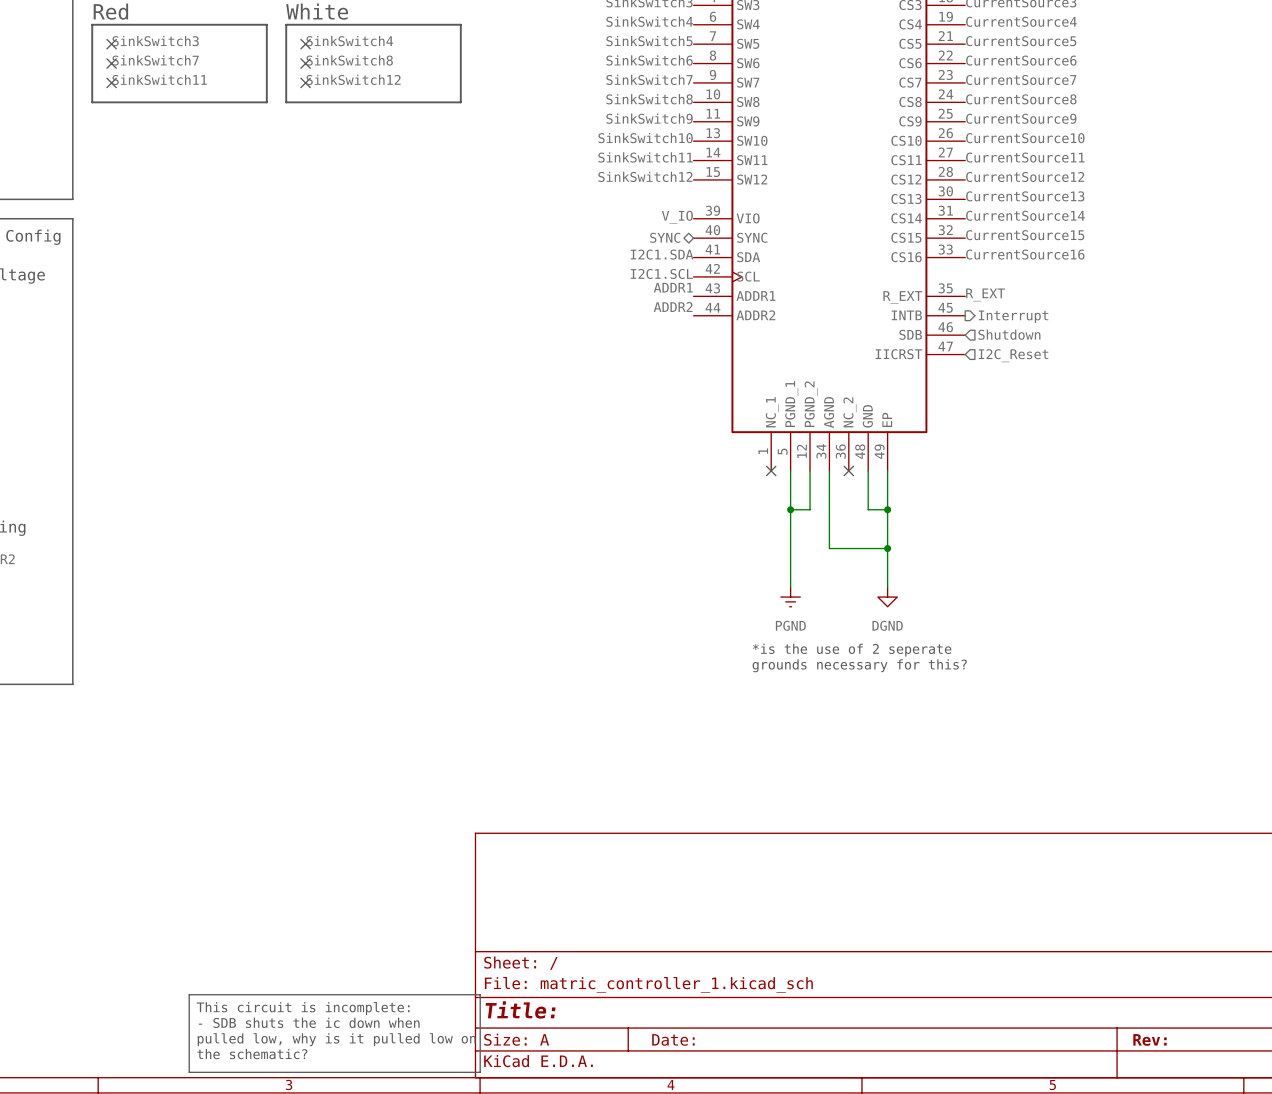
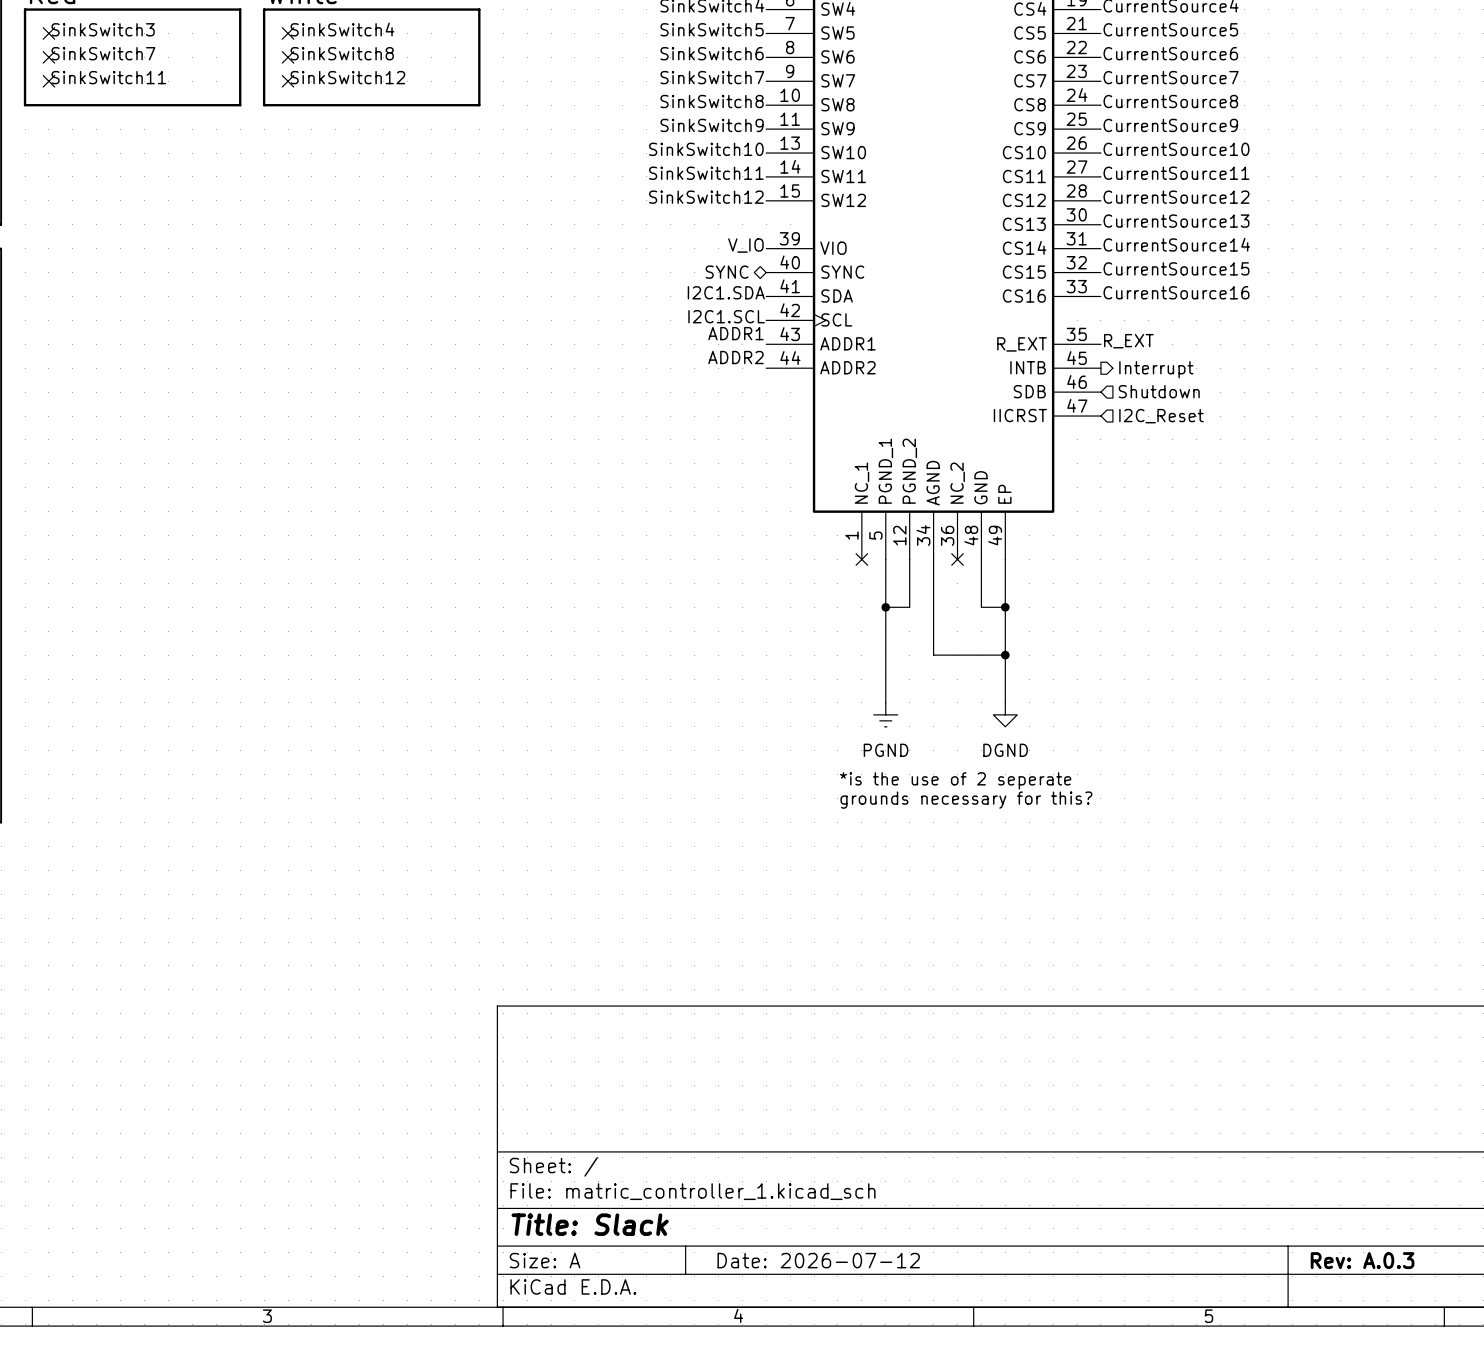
line: (189, 994) (480, 994) (480, 1072) (189, 1072) (189, 994) -> none
text: This circuit is incomplete: (303, 1008) -> none
title block: Title: (520, 1009) -> Title: Slack (590, 1224)
text: - SDB shuts the ic down when (309, 1022) -> none
text: pulled low, why is it pulled low on (336, 1039) -> none
title block: Date: (673, 1039) -> Date: 2026-07-12 (818, 1260)
title block: Rev: (1150, 1039) -> Rev: A.0.3 (1362, 1260)
text: the schematic? (252, 1054) -> none

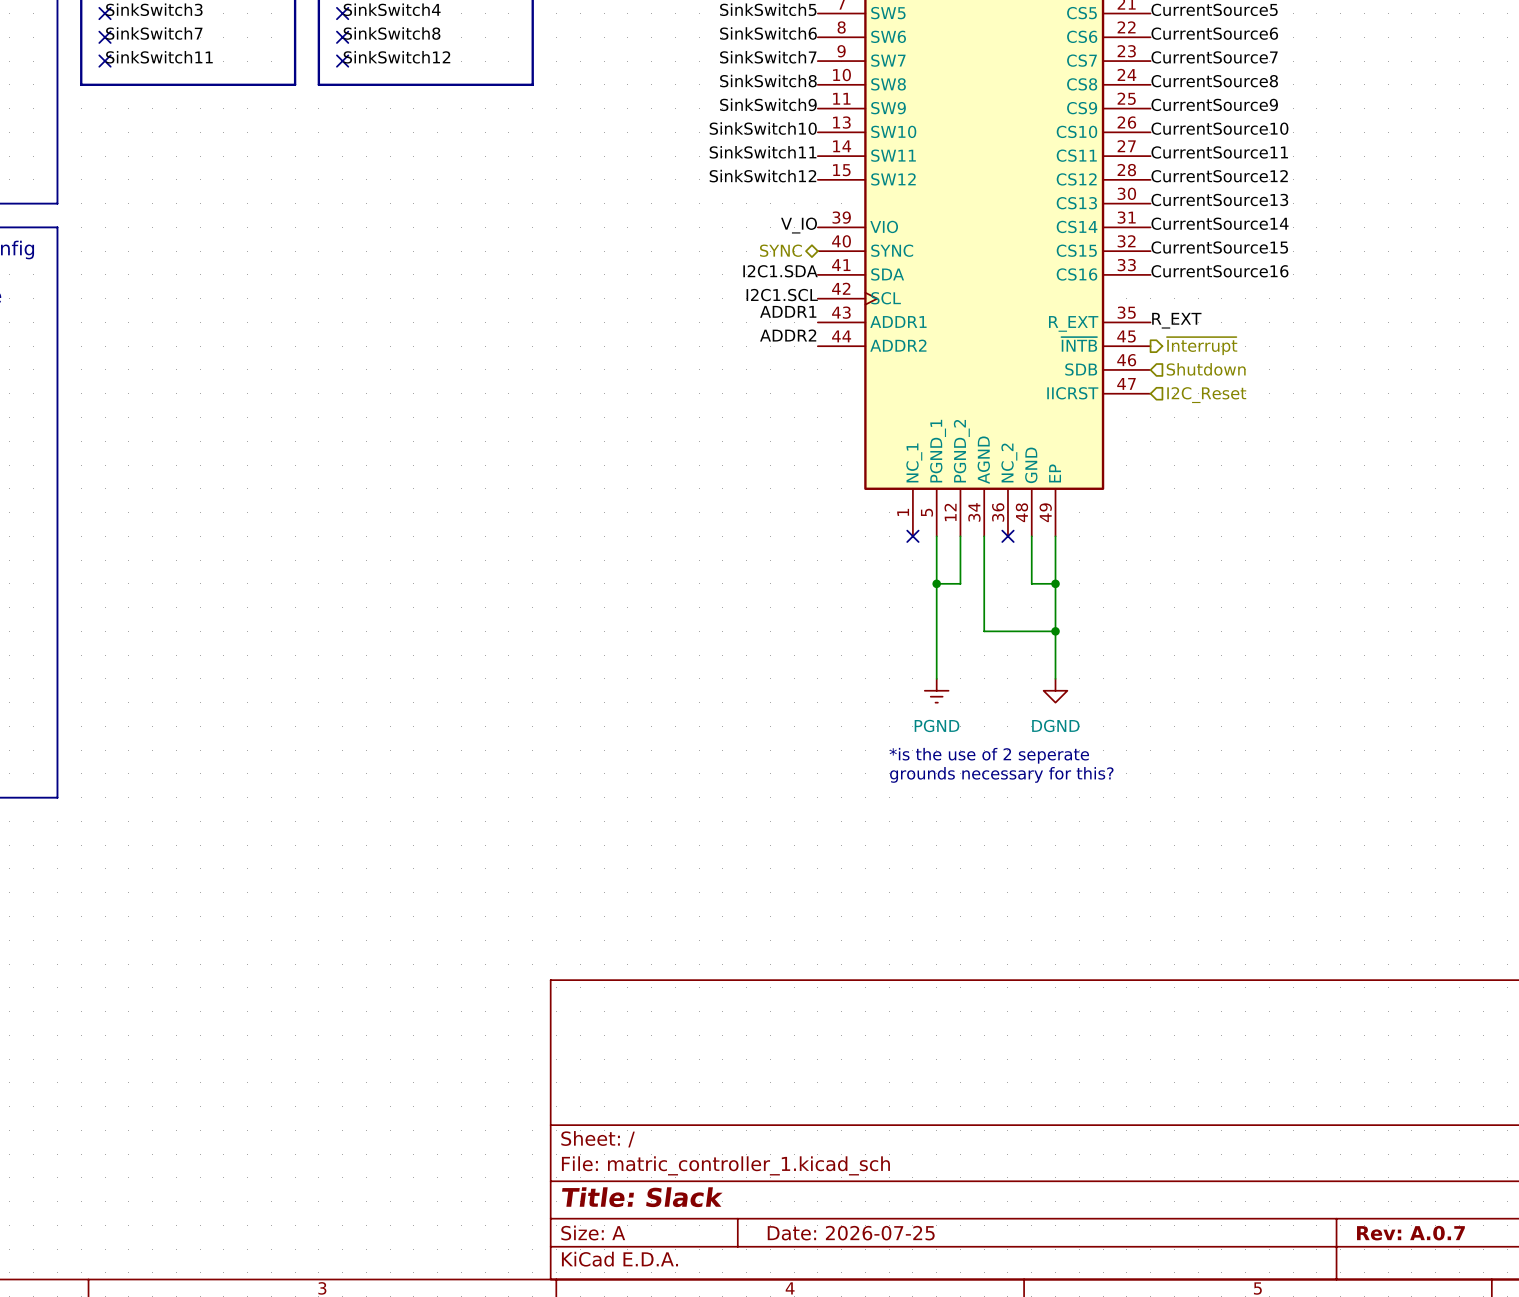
part pin name: INTB (1028, 367) -> ~{INTB} (1079, 344)
hierarchical label: Interrupt (1156, 369) -> ~{Interrupt} (1202, 346)
title block: Date: 2026-07-12 (818, 1260) -> Date: 2026-07-25 (851, 1233)
title block: Rev: A.0.3 (1362, 1260) -> Rev: A.0.7 (1410, 1233)

